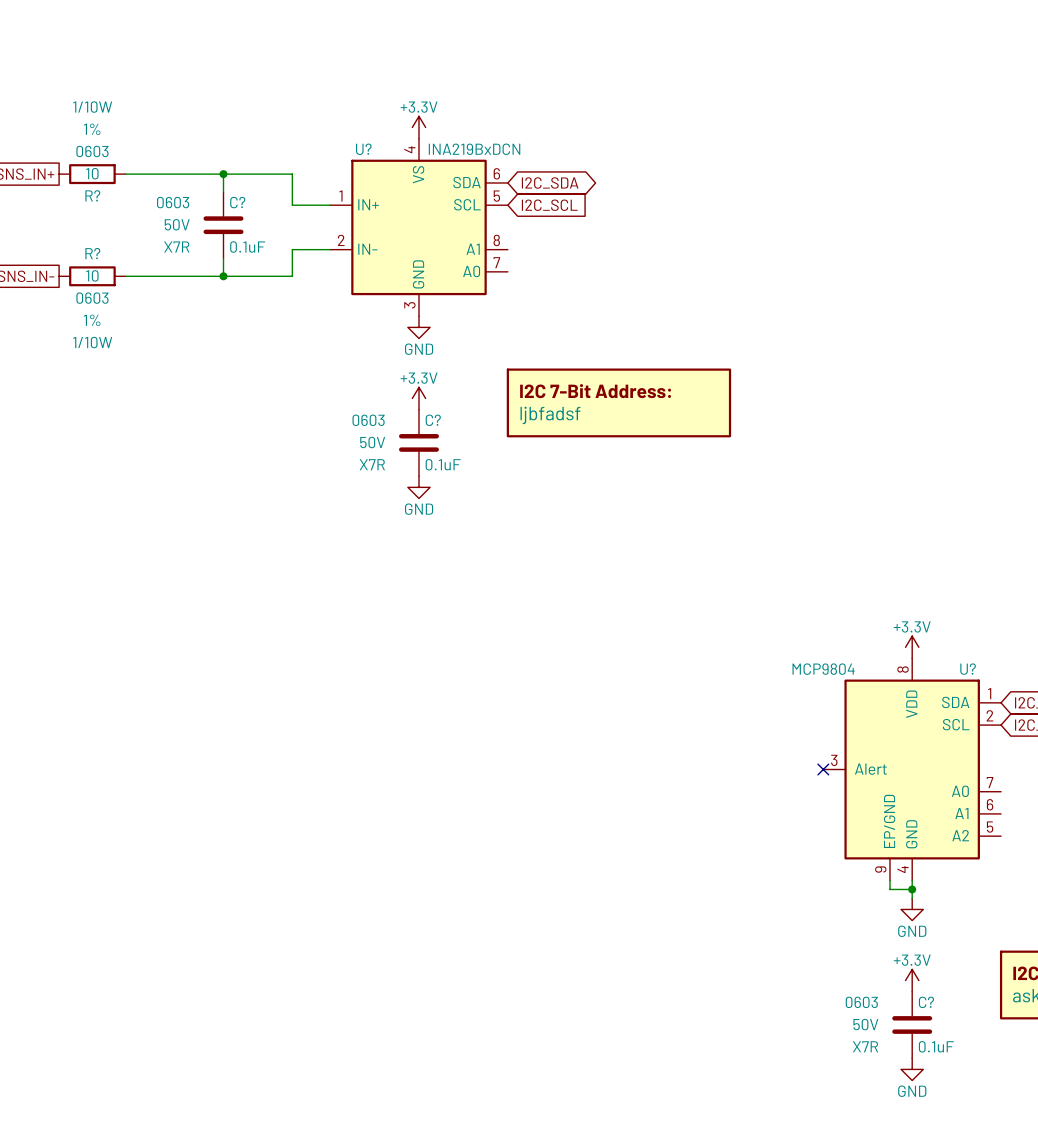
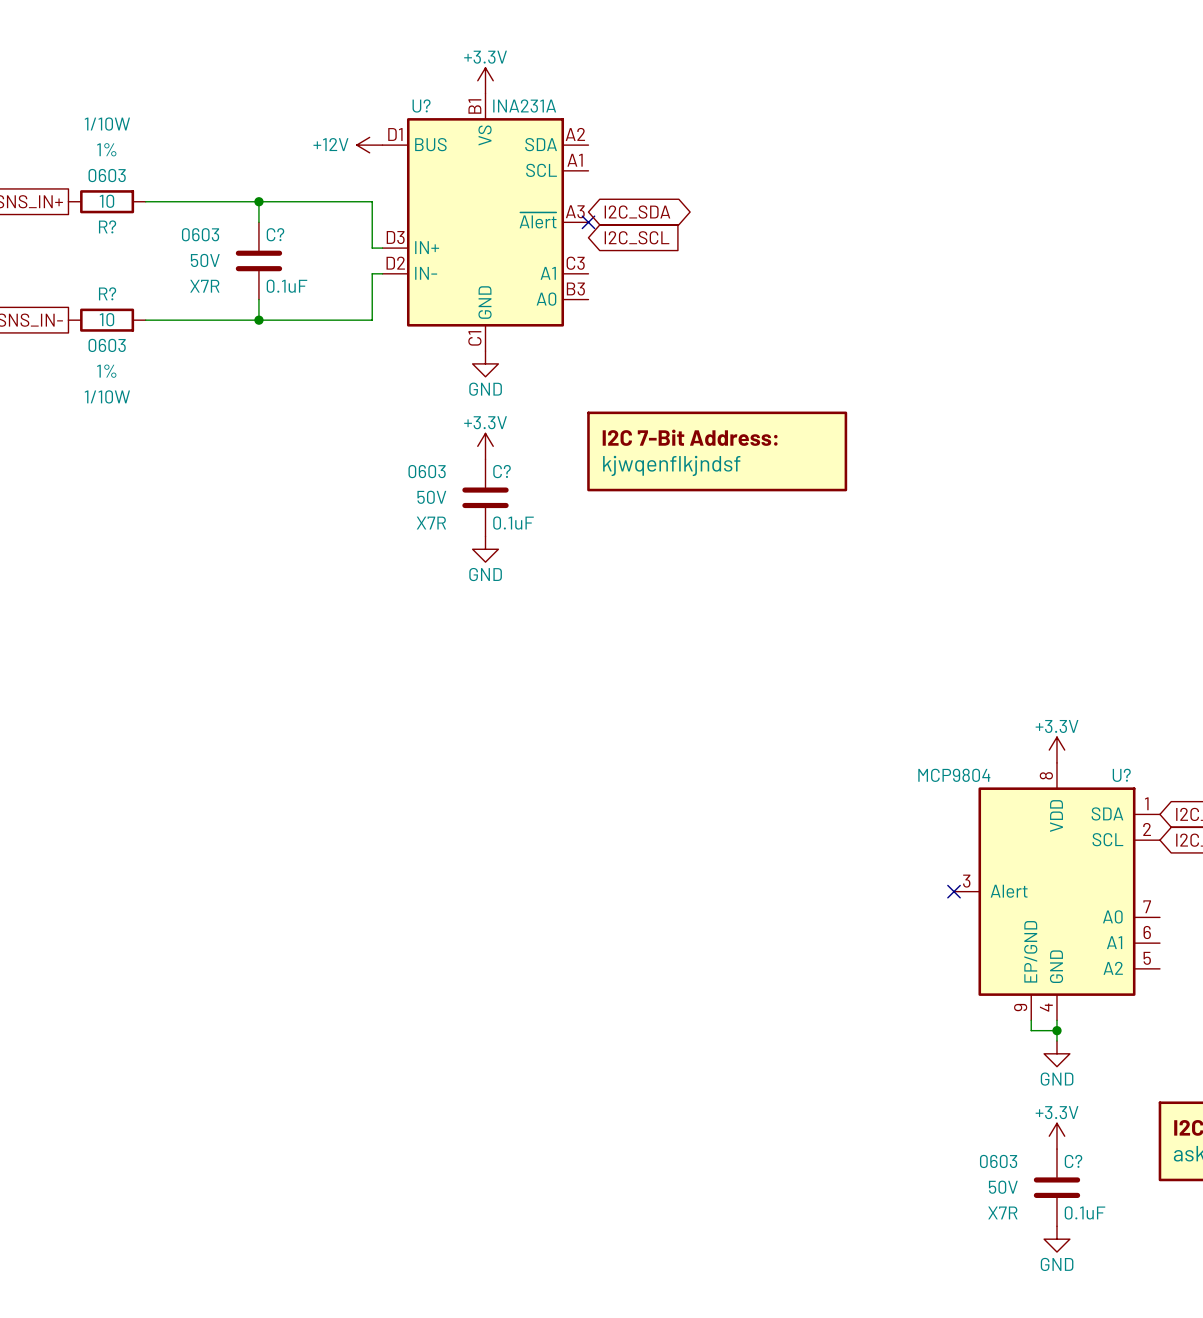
power symbol: none -> +12V (369, 145)
power symbol position: +3.3V (418, 127) -> +3.3V (485, 80)
wire: (292, 174) (292, 205) (330, 205) -> (338, 201) (372, 201) (372, 248) (382, 248)
U?: none -> INA231A (485, 222)
no-connect mark: none -> (588, 222)
U?: INA219BxDCN (418, 227) -> none
wire: (330, 249) (292, 249) (292, 276) -> (382, 273) (372, 273) (372, 320) (338, 320)
power symbol position: GND (418, 327) -> GND (485, 363)
part: none -> kjwqenflkjndsf (717, 451)
power symbol position: +3.3V (418, 398) -> +3.3V (485, 446)
part: ljbfadsf (618, 402) -> none
C? position: (418, 442) -> (485, 497)
power symbol position: GND (418, 487) -> GND (485, 549)

